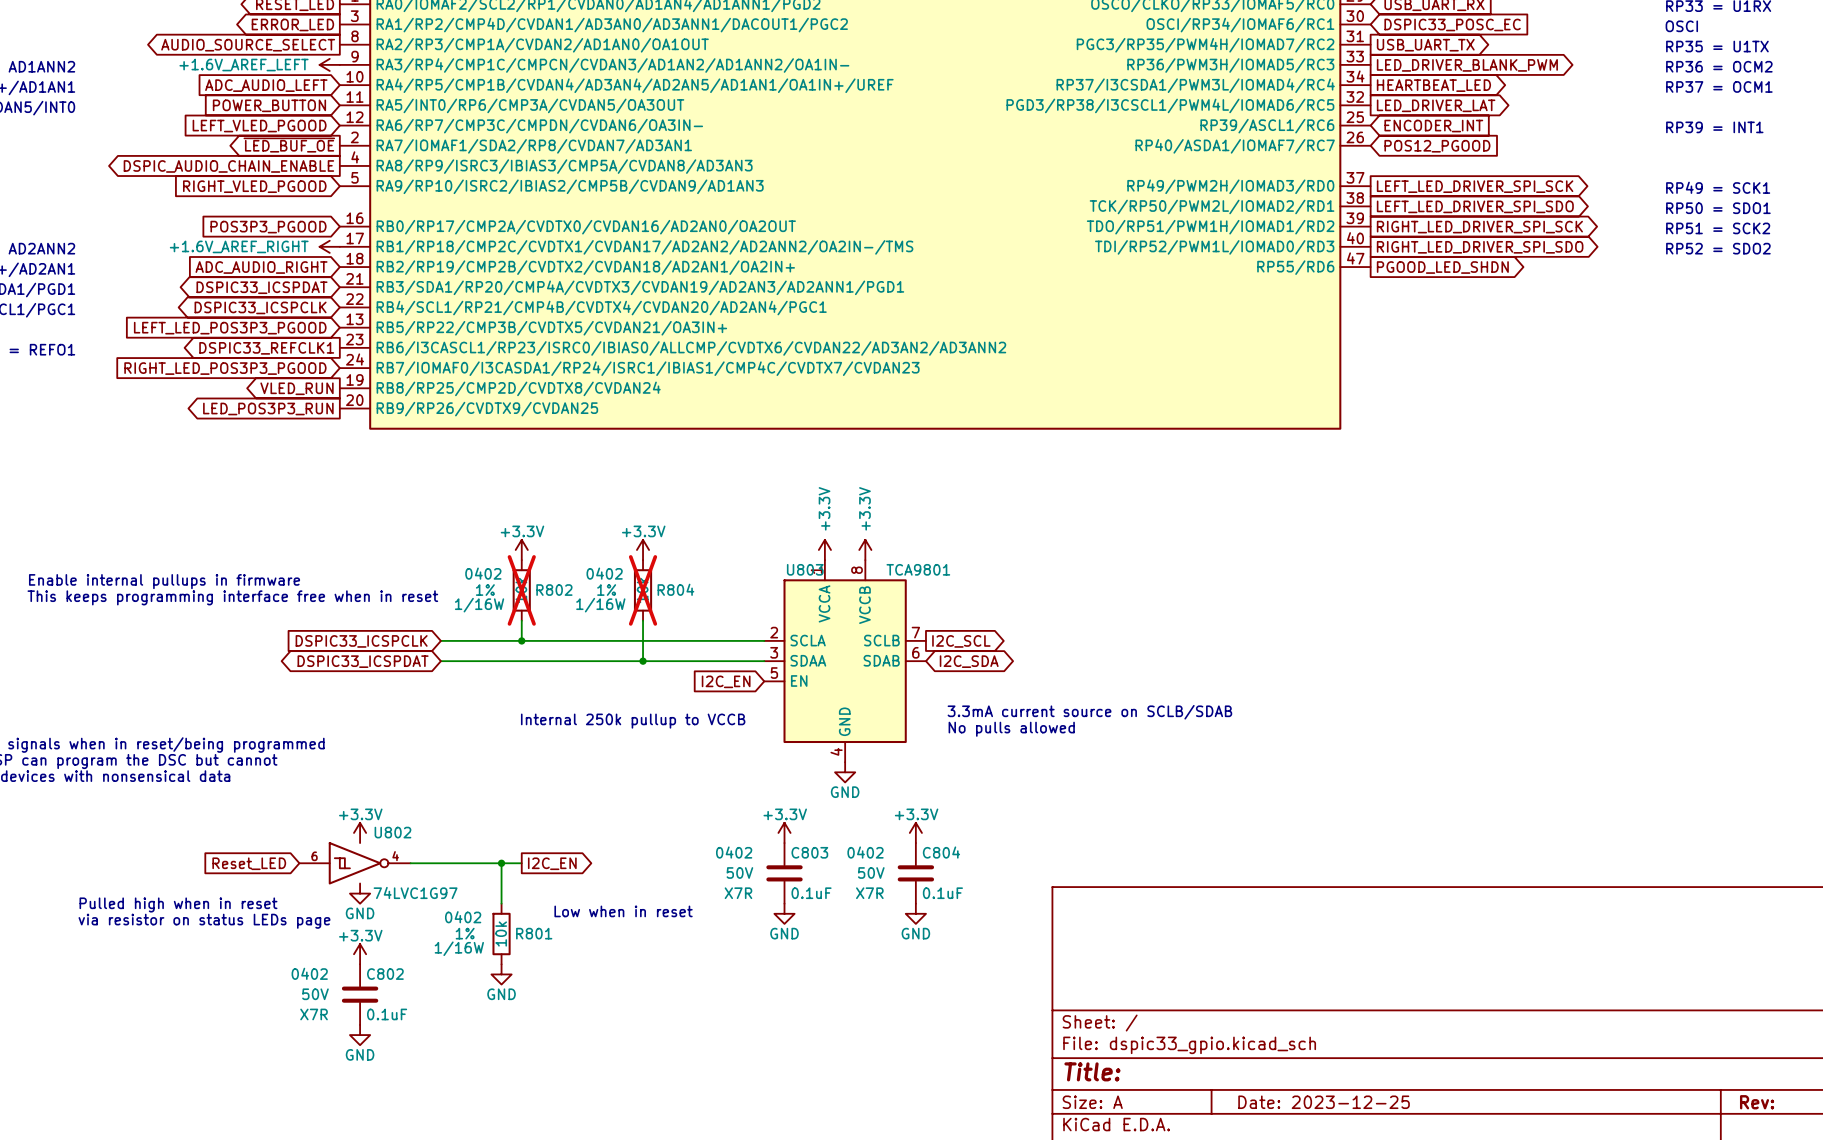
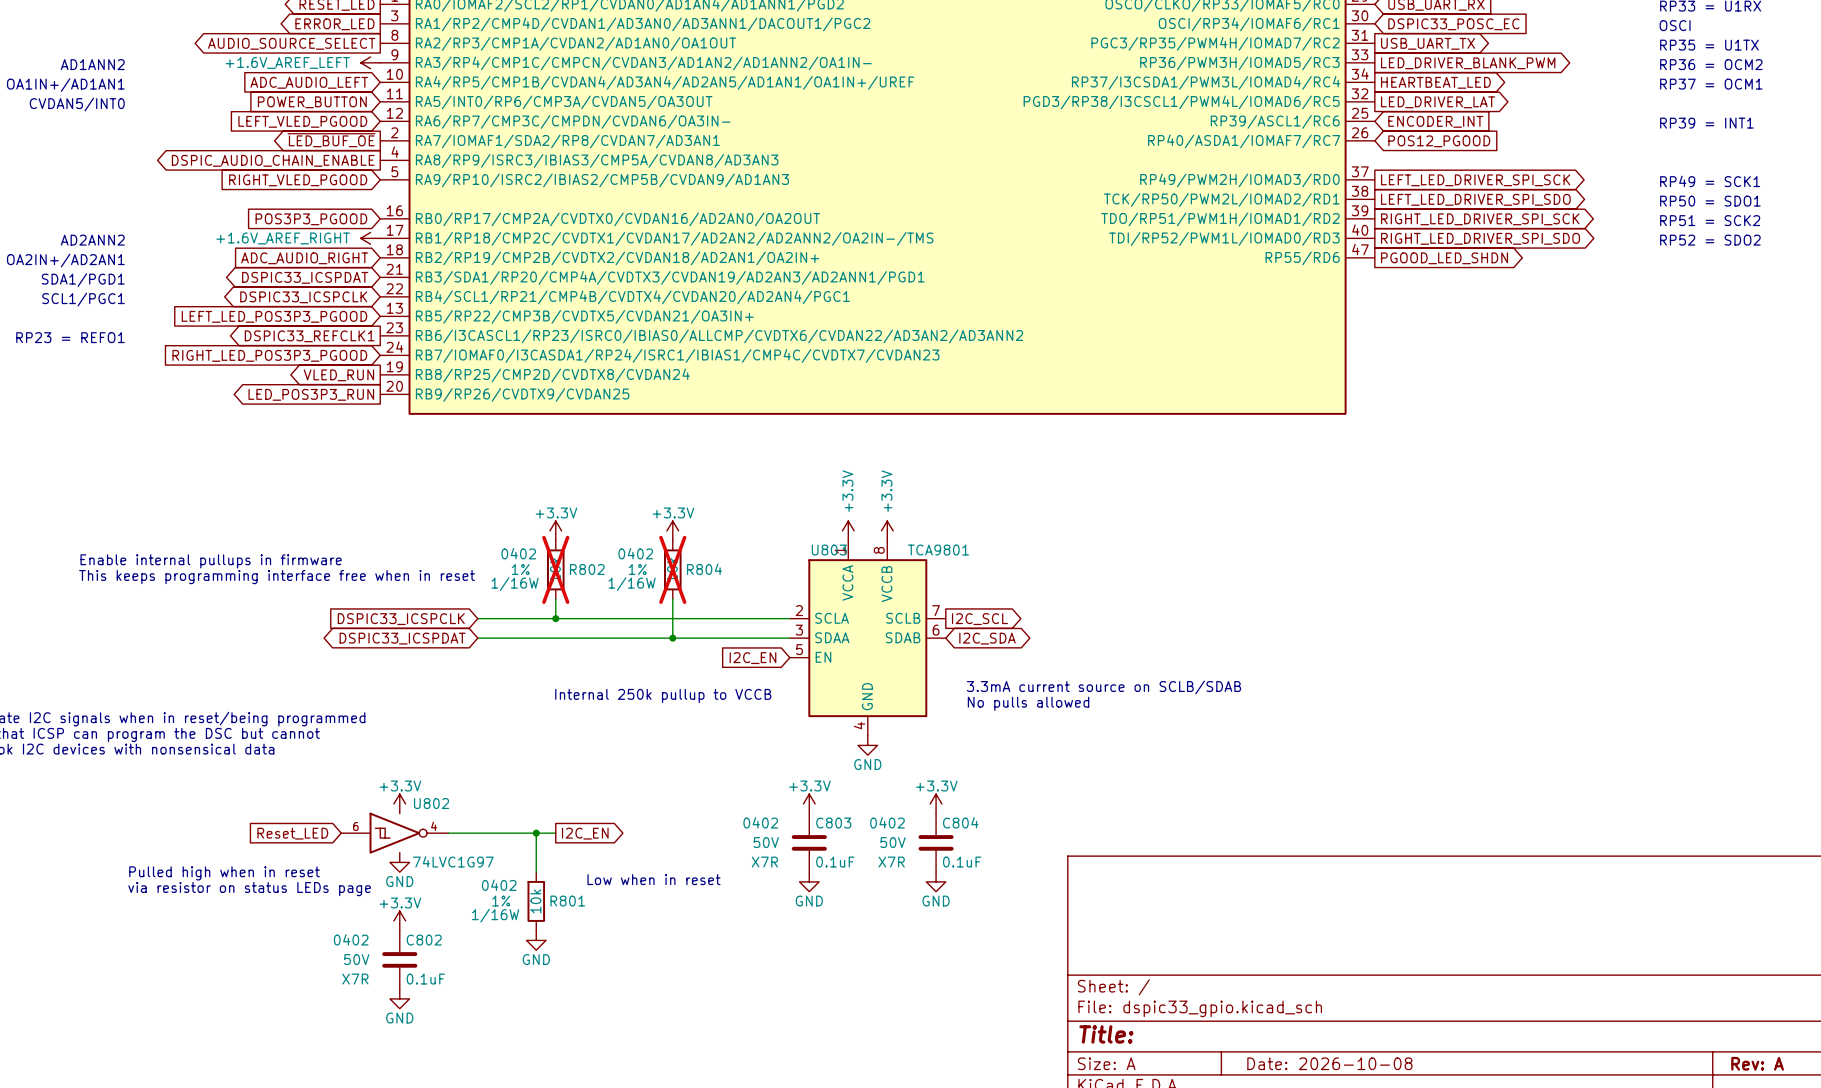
title block: Date: 2023-12-25 (1324, 1102) -> Date: 2026-10-08 (1329, 1063)
title block: Rev: (1757, 1102) -> Rev: A (1757, 1063)

